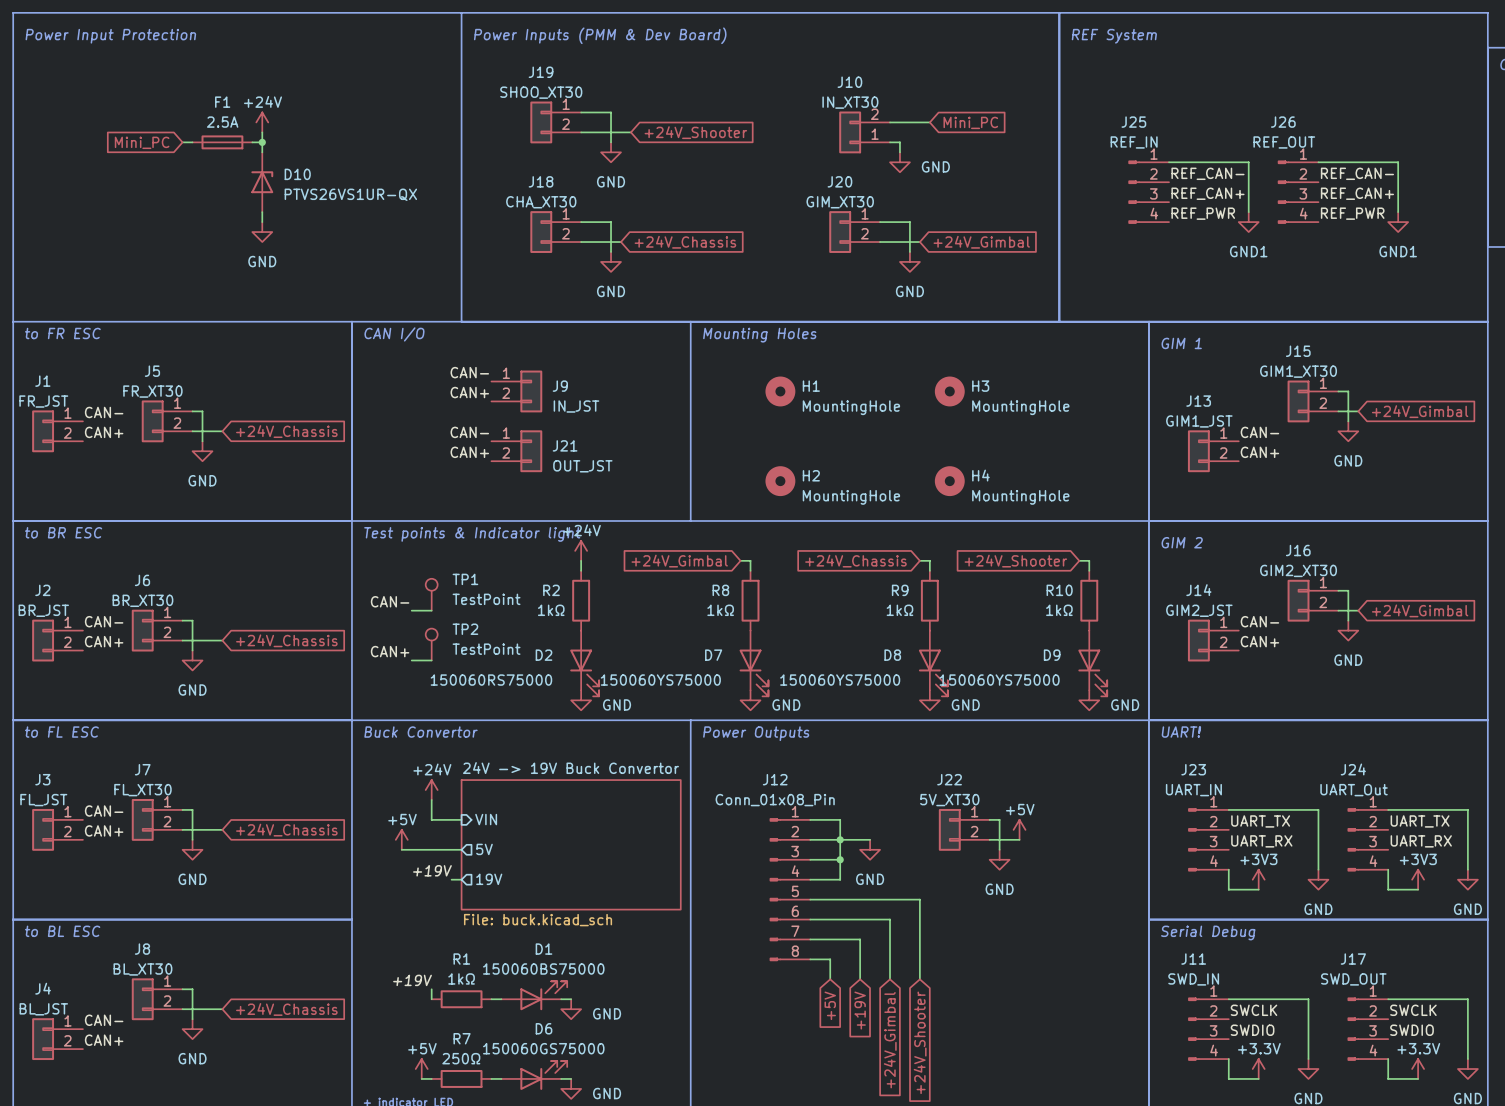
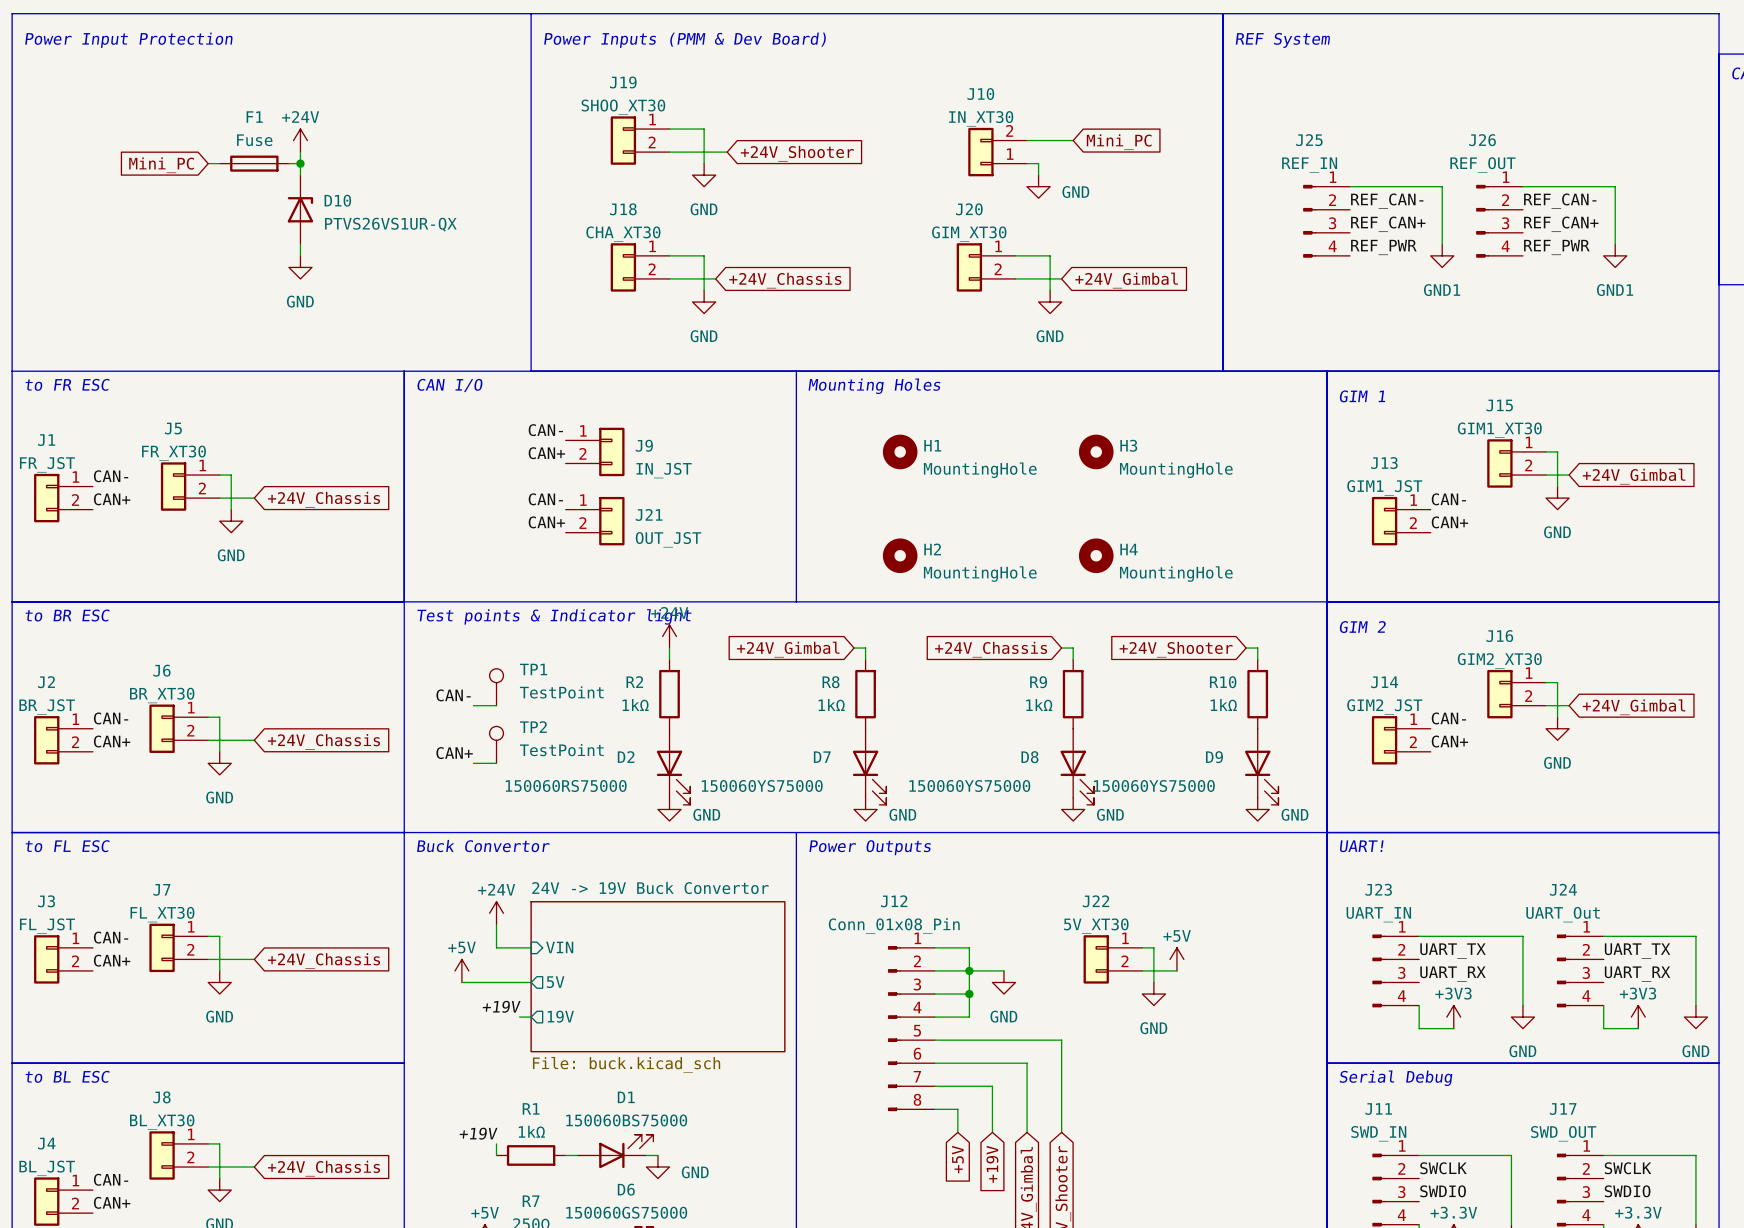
F1 value: 2.5A (222, 122) -> Fuse (254, 140)

